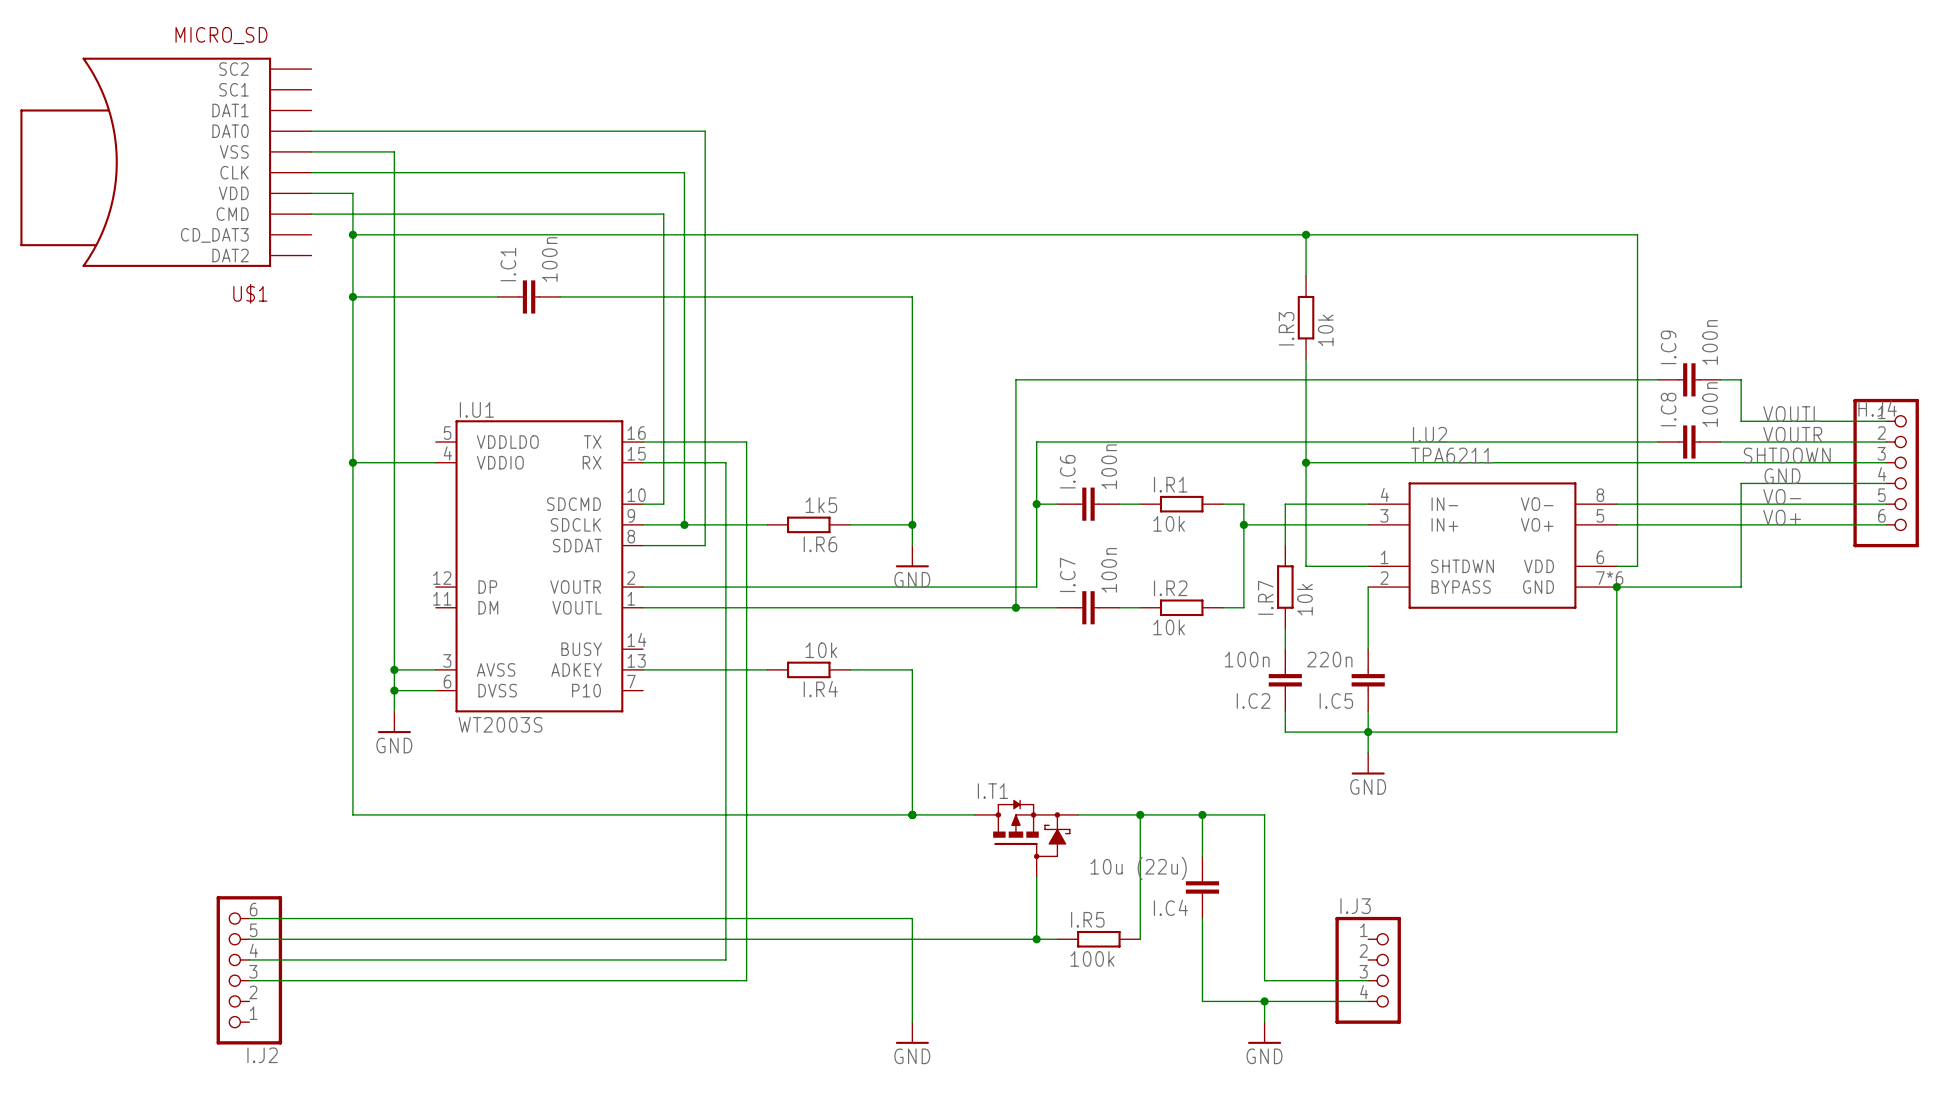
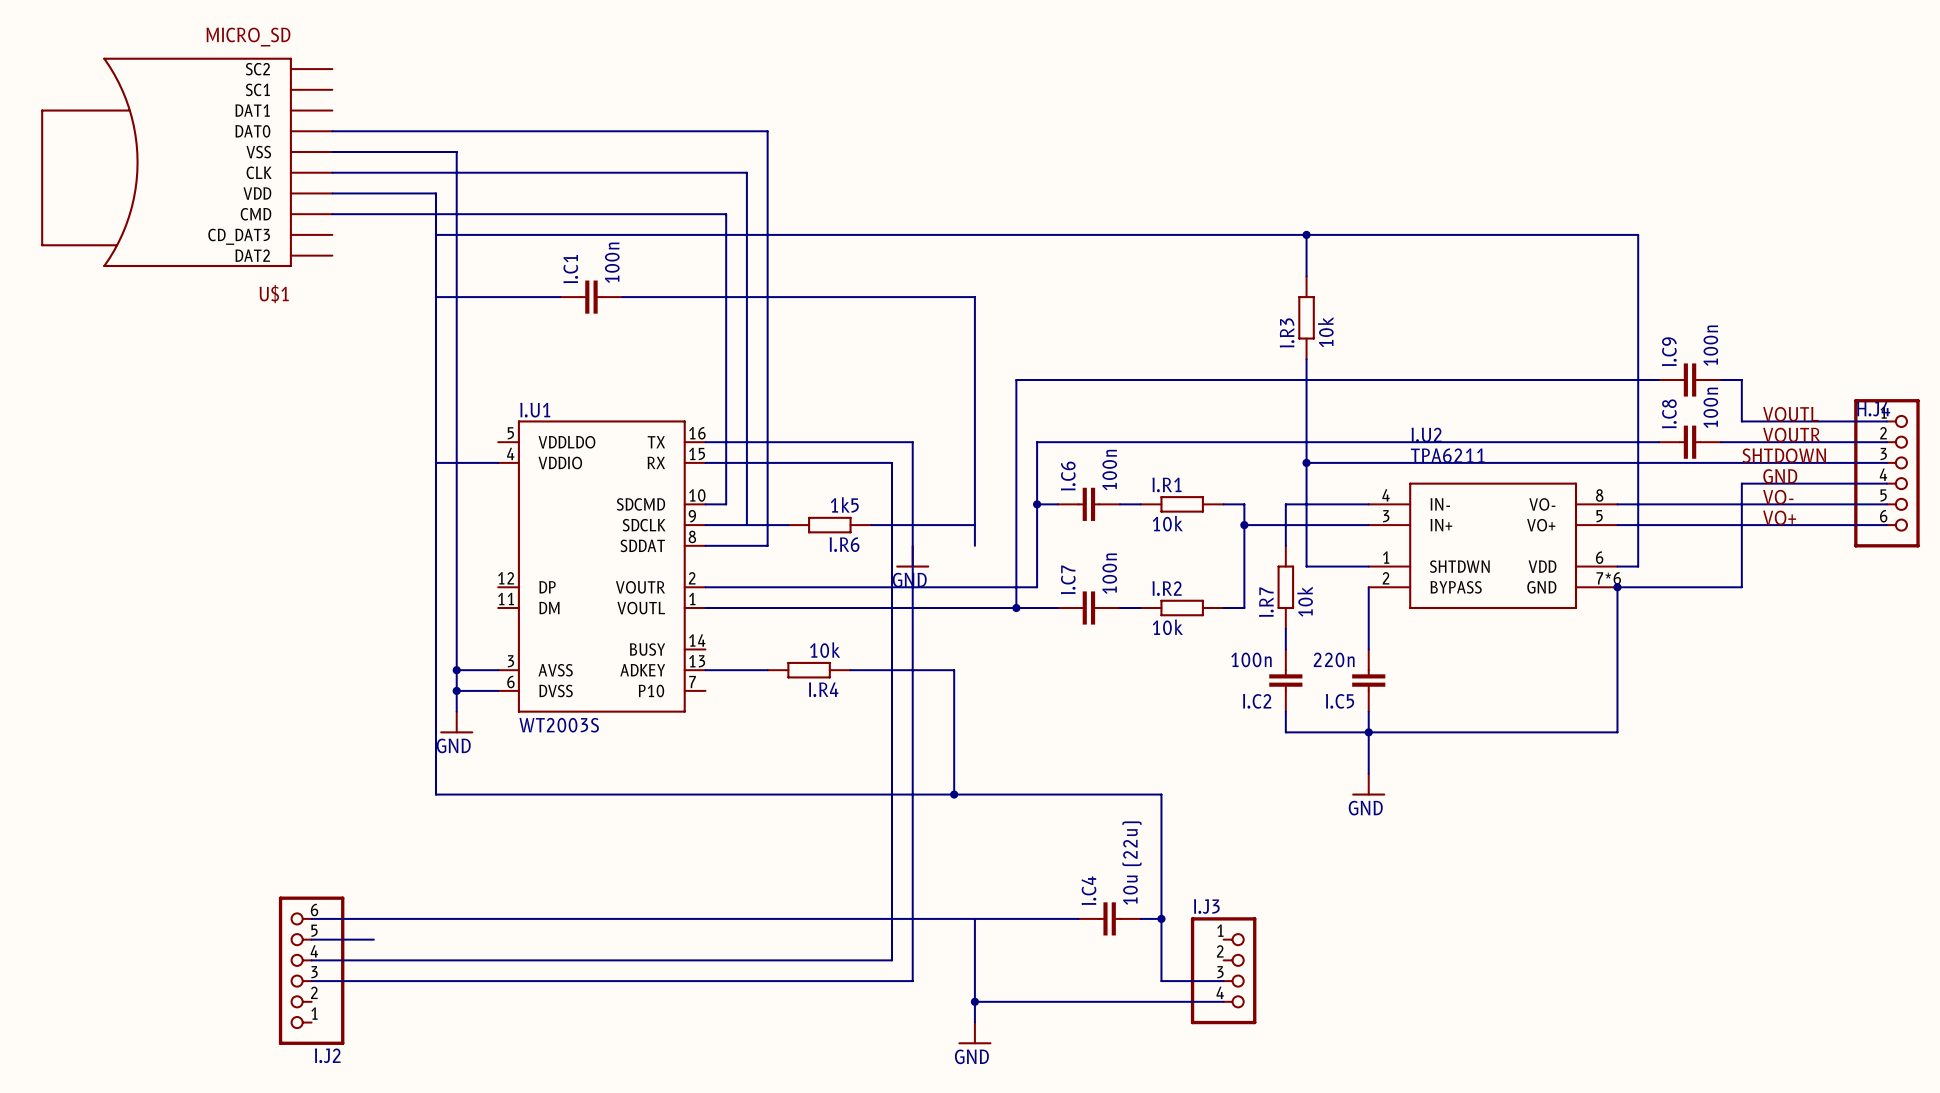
wire: (705, 131) (705, 545) (643, 545) -> (705, 131) (767, 131) (767, 545) (705, 545)
wire: (394, 151) (394, 711) -> (394, 152) (456, 152) (456, 711)
U$1 position: (165, 162) -> (186, 162)
wire: (684, 172) (684, 524) -> (684, 172) (746, 172) (746, 442) (912, 442)
wire: (352, 193) (352, 814) (974, 814) -> (353, 193) (436, 193) (436, 794) (1161, 794) (1161, 981) (1223, 981)
wire: (663, 214) (663, 504) (643, 504) -> none
wire: (352, 234) (435, 234) -> none
junction: (352, 234) -> none
wire: (352, 296) (435, 296) -> none
junction: (352, 296) -> none
I.C1 position: (529, 296) -> (591, 297)
wire: (912, 296) (912, 442) -> (912, 297) (974, 297) (974, 545)
wire: (643, 442) (705, 442) -> none
wire: (352, 462) (435, 462) -> (498, 462) (436, 462)
junction: (352, 462) -> none
wire: (643, 462) (705, 462) -> none
wire: none -> (705, 504) (726, 504)
wire: (725, 504) (725, 959) -> (664, 214) (726, 214) (726, 462) (892, 462) (892, 960) (726, 960)
wire: (643, 524) (705, 524) -> none
junction: (684, 524) -> none
wire: (746, 524) (746, 980) -> none
I.R6 position: (808, 524) -> (829, 525)
wire: none -> (912, 525) (974, 525)
junction: (912, 524) -> none
wire: none -> (912, 545) (912, 670) (954, 670) (954, 794)
I.U1 position: (539, 566) -> (601, 566)
wire: (643, 587) (705, 587) -> none
wire: (643, 607) (705, 607) -> none
wire: (394, 669) (435, 669) -> (456, 670) (498, 670)
junction: (394, 669) -> none
junction: none -> (456, 670)
wire: (643, 669) (705, 669) -> none
wire: (394, 690) (435, 690) -> (456, 690) (498, 690)
junction: (394, 690) -> none
junction: none -> (456, 690)
power symbol position: GND (394, 722) -> GND (456, 722)
power symbol position: GND (1368, 763) -> GND (1368, 784)
wire: none -> (912, 815) (912, 918) (1078, 918)
junction position: (912, 814) -> (954, 794)
wire: (1078, 814) (1264, 814) (1264, 980) (1368, 980) -> none
wire: (1140, 814) (1140, 939) -> none
junction: (1140, 814) -> none
wire: (1202, 814) (1202, 856) -> none
junction: (1202, 814) -> none
I.T1: (1026, 838) -> none
wire: (1036, 877) (1036, 939) -> none
I.C4 rotation: 0° (1202, 887) -> 90° clockwise (1109, 918)
I.C4 position: (1202, 887) -> (1109, 918)
wire: (249, 918) (311, 918) -> none
wire: none -> (974, 918) (974, 1022)
wire: none -> (1140, 918) (1161, 918)
junction: none -> (1161, 918)
wire: (1202, 918) (1202, 1001) -> (974, 1001) (1202, 1001)
wire: (249, 939) (311, 939) -> none
wire: (373, 939) (1057, 939) -> none
junction: (1036, 939) -> none
I.R5: 100k (1098, 939) -> none
wire: (249, 959) (311, 959) -> none
I.J2 position: (249, 970) -> (311, 970)
I.J3 position: (1368, 970) -> (1223, 970)
wire: (249, 980) (311, 980) -> none
wire: (912, 980) (912, 1022) -> (912, 981) (746, 981)
junction: none -> (974, 1001)
wire: (1223, 1001) (1368, 1001) -> none
wire: (1264, 1001) (1264, 1022) -> none
junction: (1264, 1001) -> none
power symbol position: GND (912, 1033) -> GND (974, 1033)
power symbol: GND (1264, 1033) -> none

